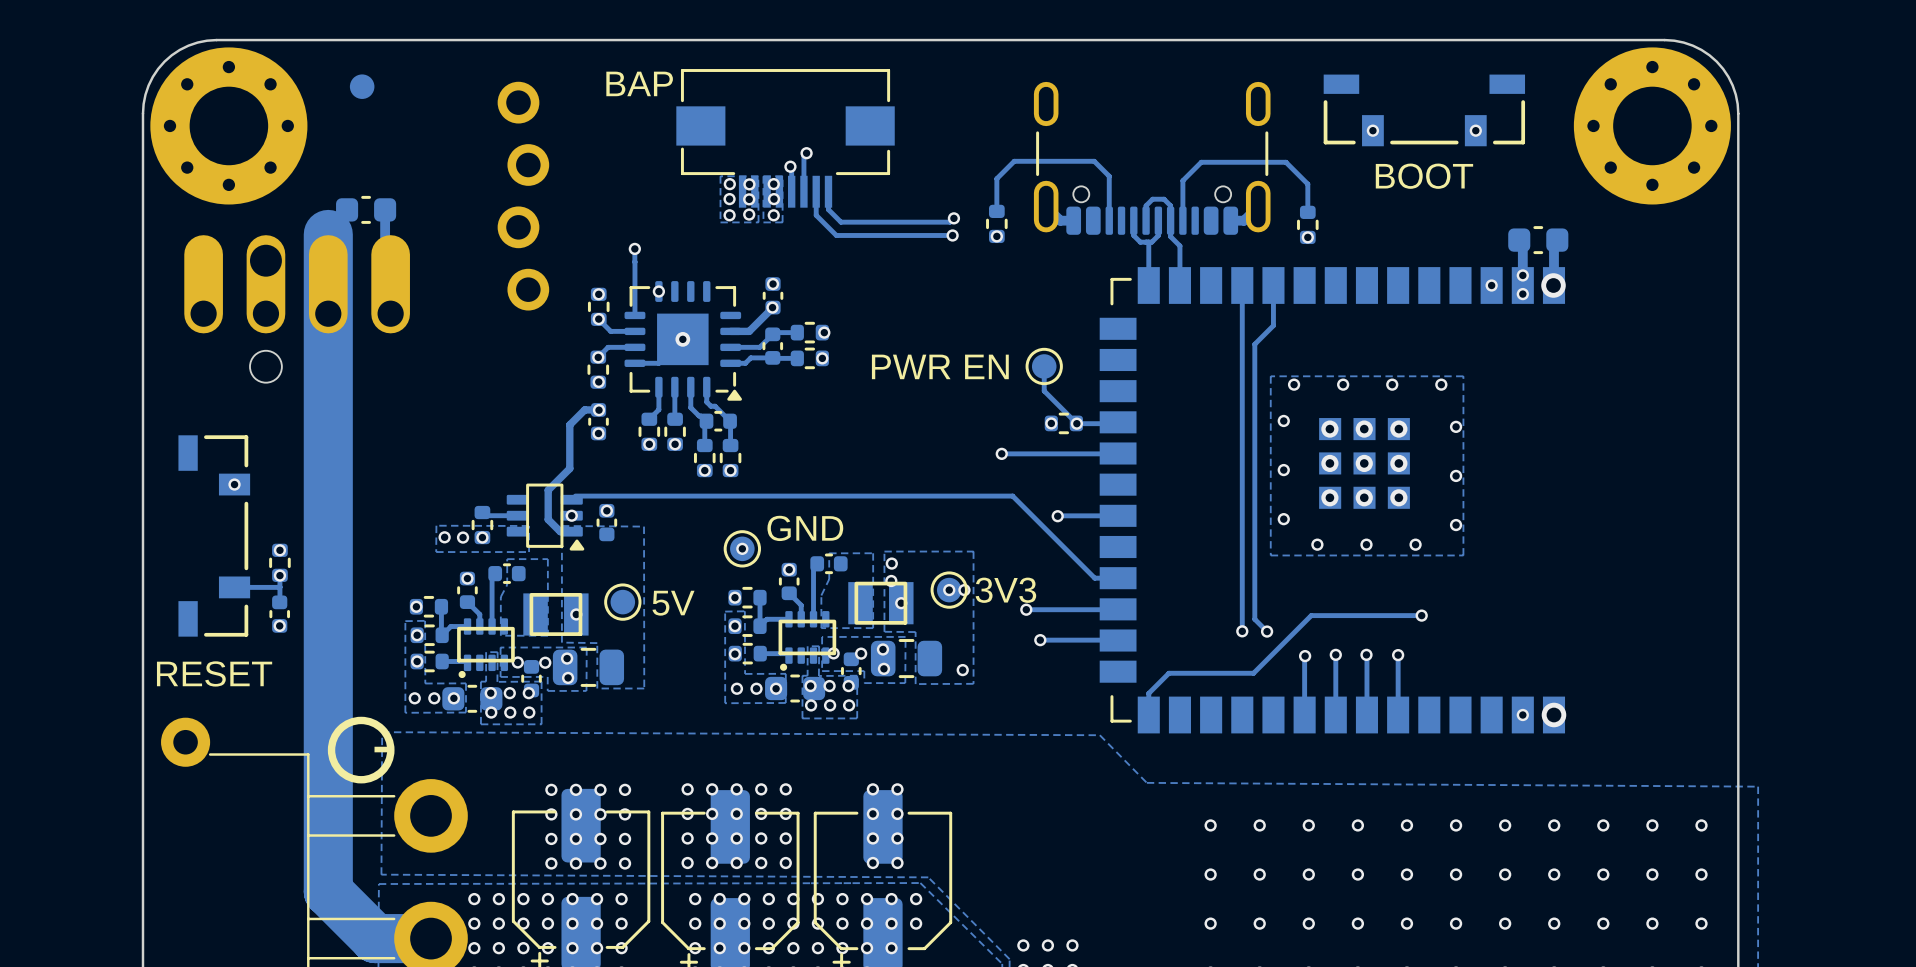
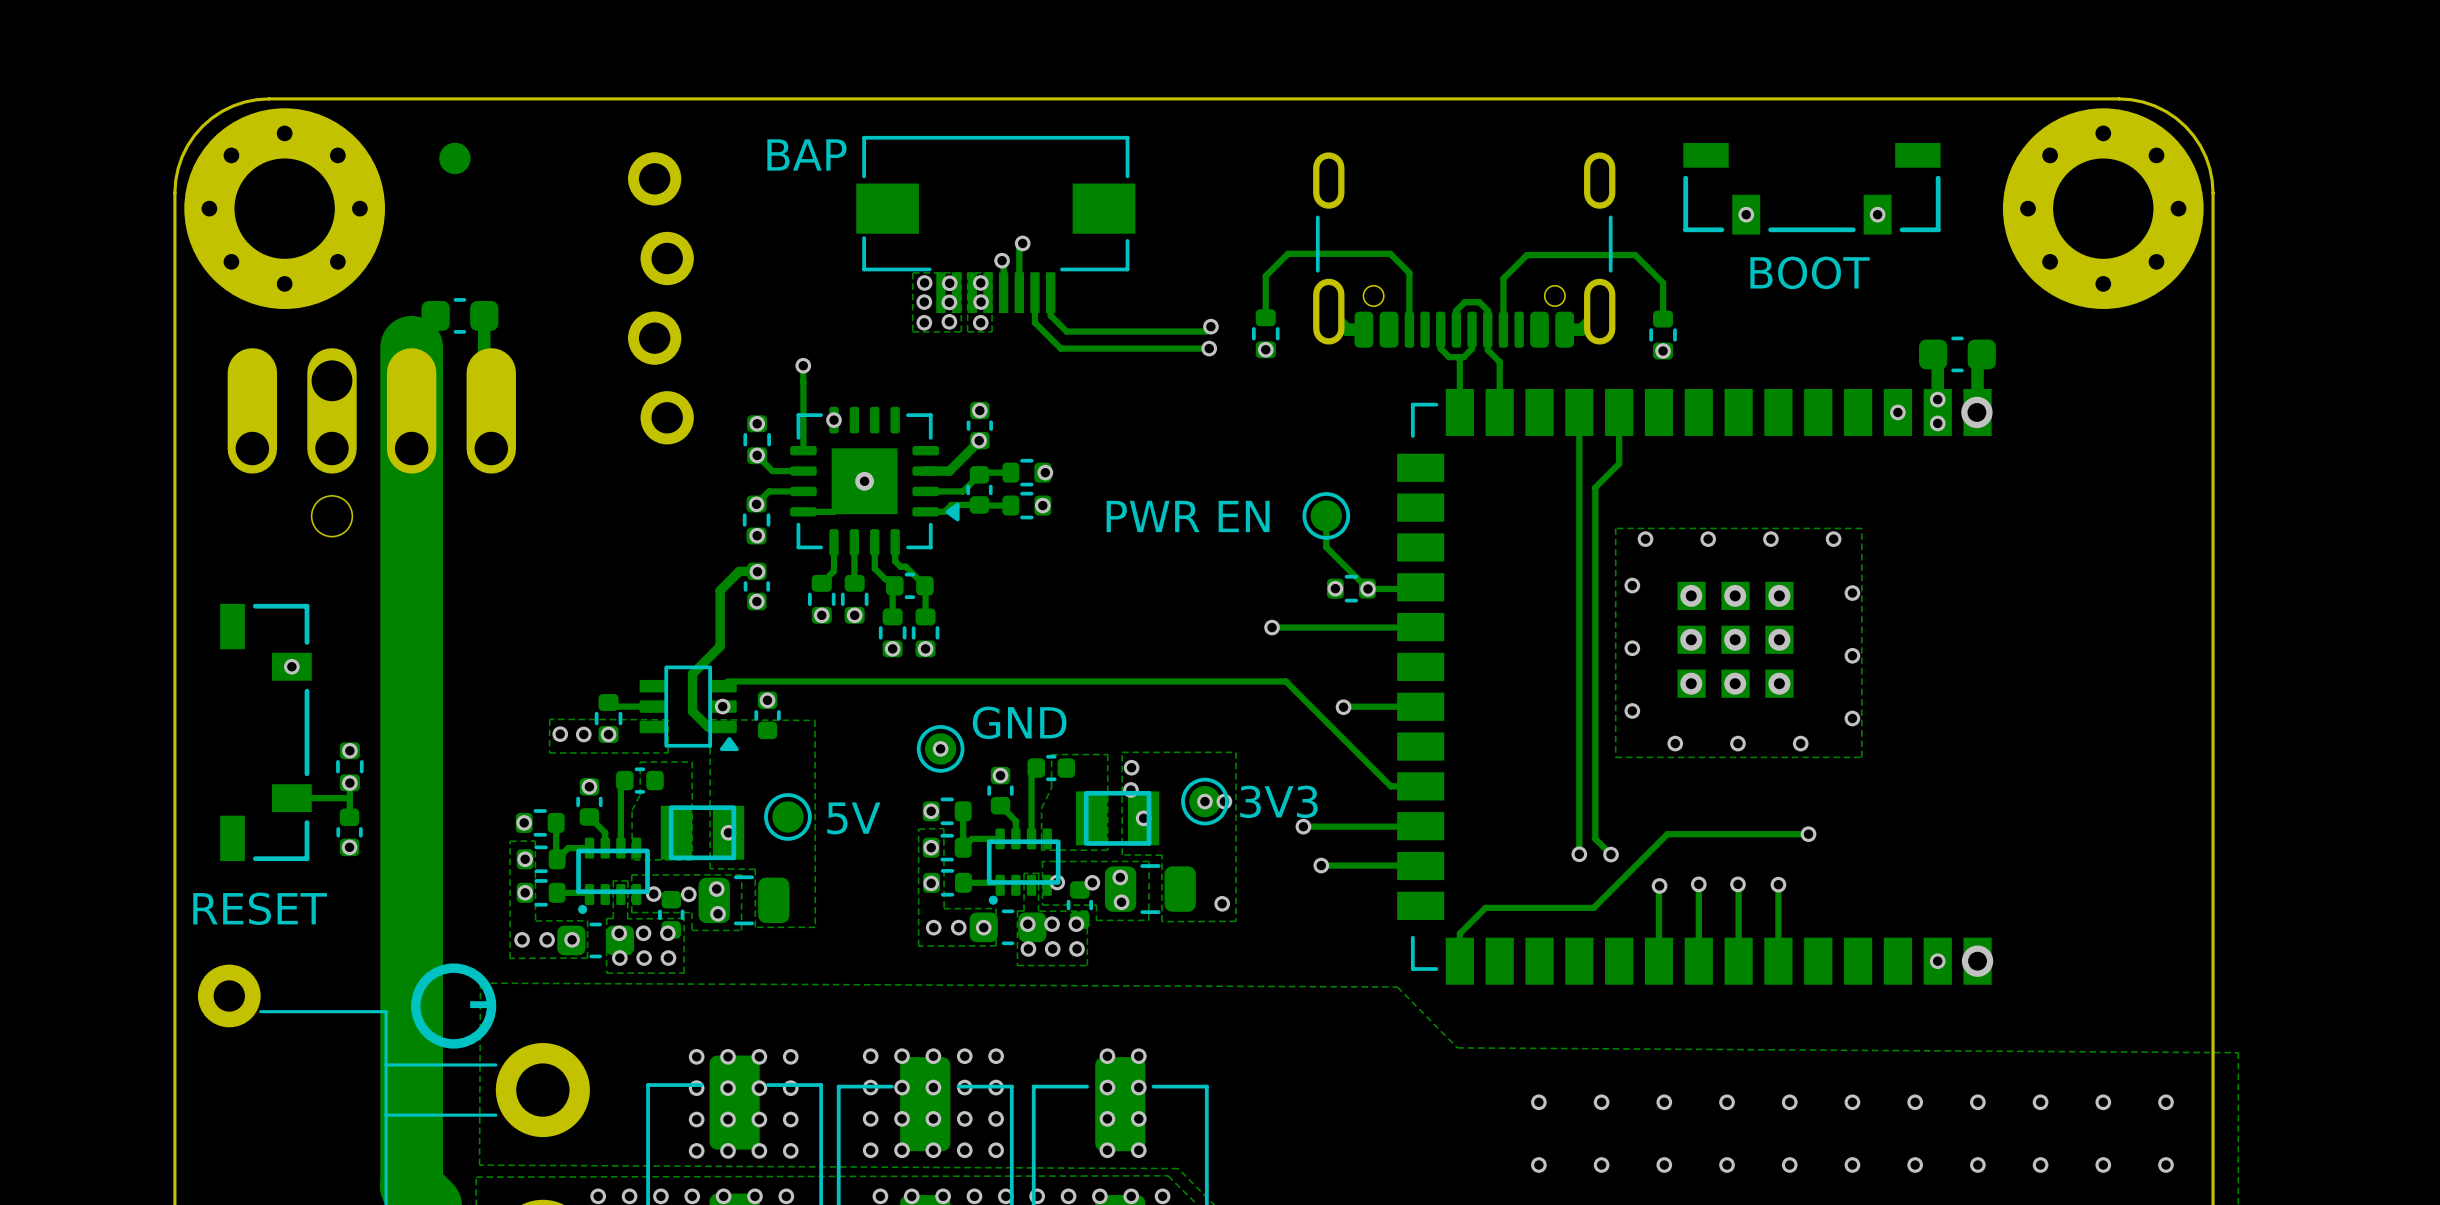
part footprint: [624, 281, 742, 401] -> [790, 406, 960, 556]

